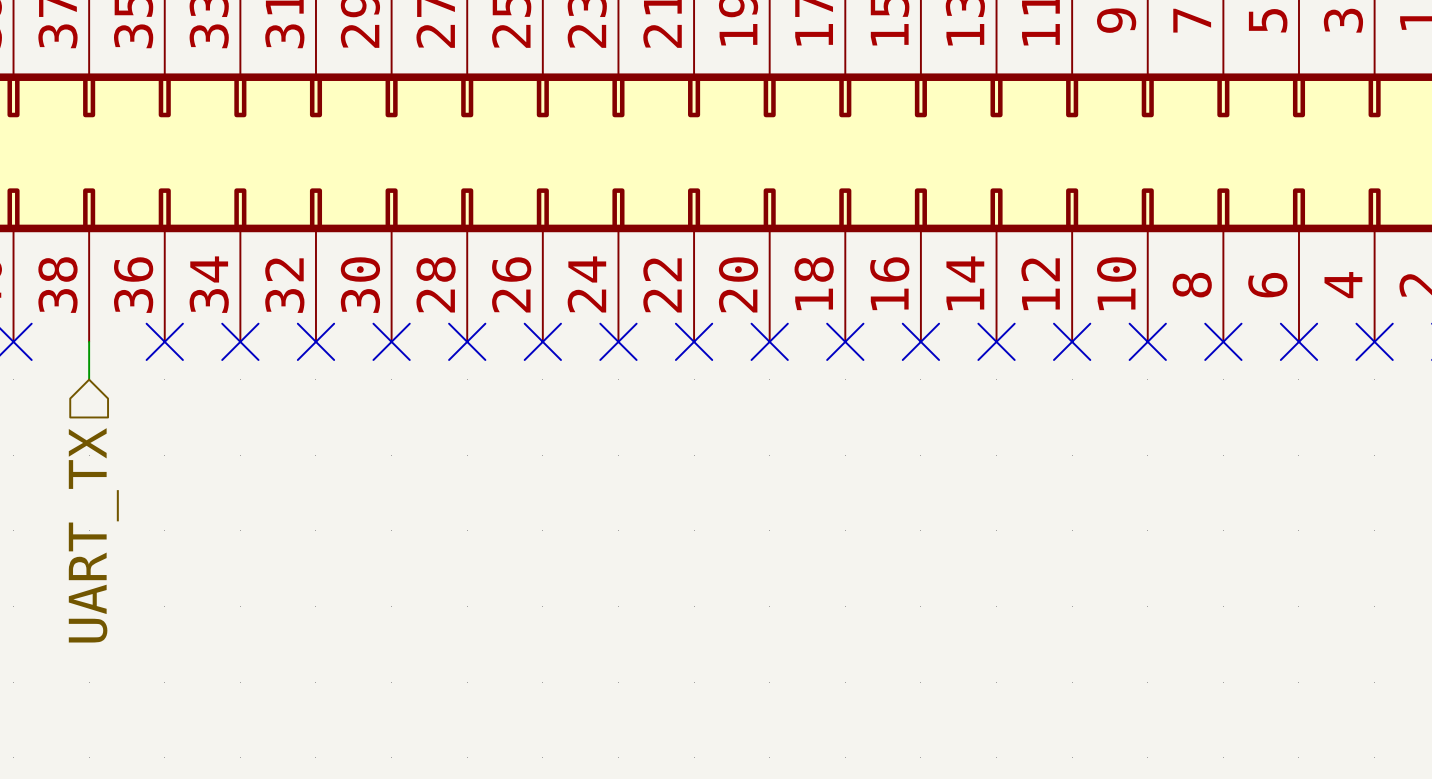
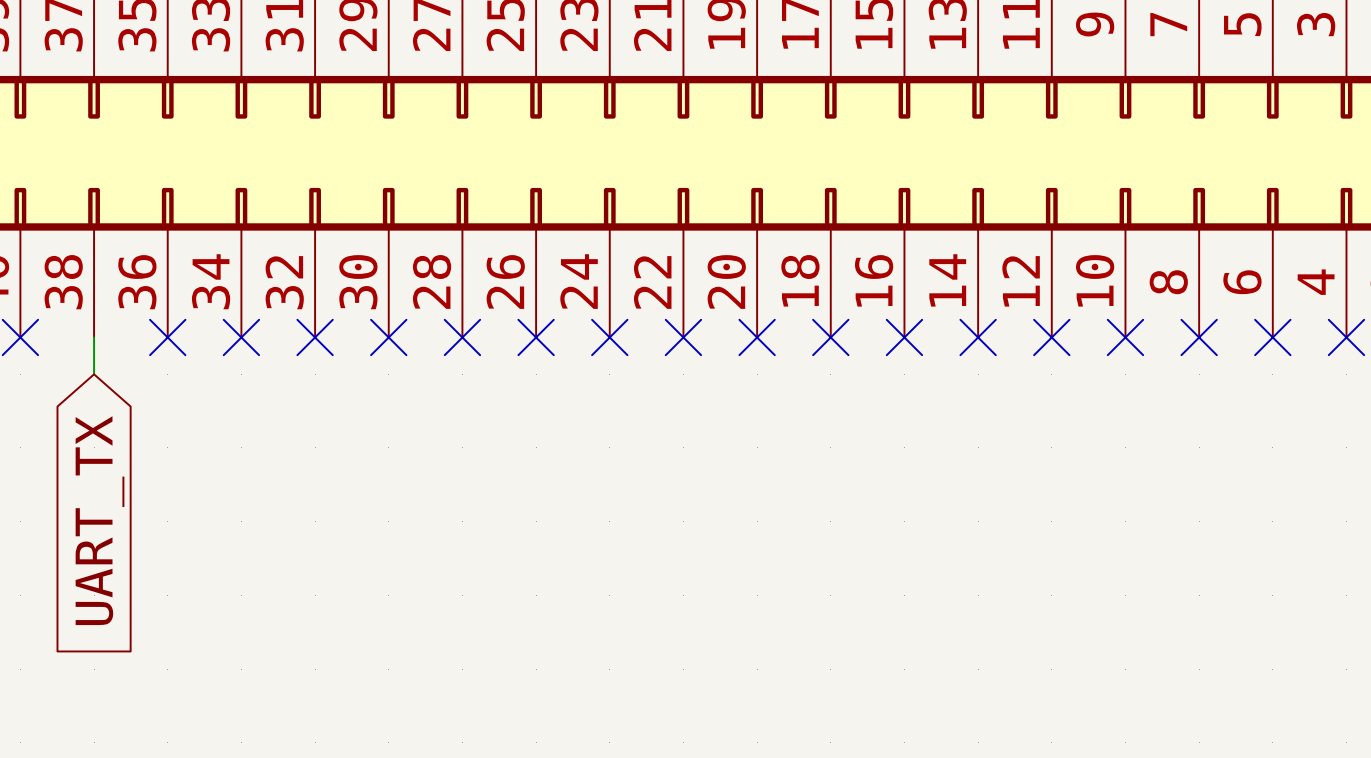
global label: none -> UART_TX (100, 520)
hierarchical label: UART_TX (93, 535) -> none

